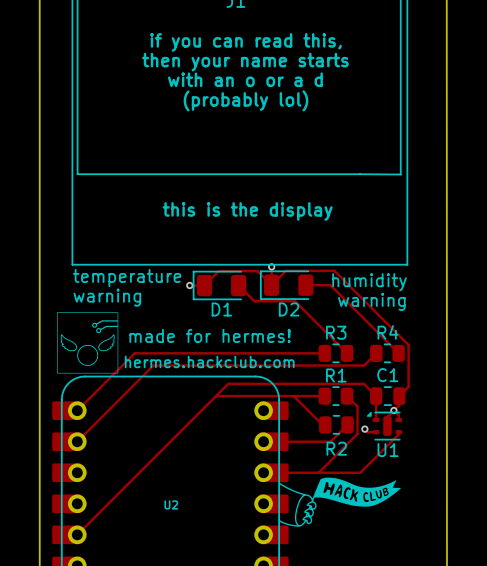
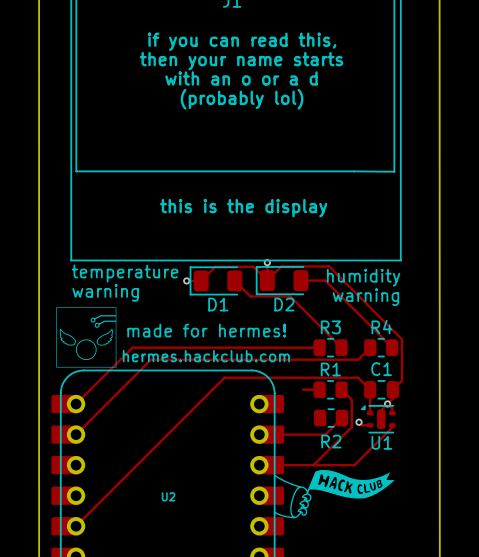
track: (216, 396) (307, 396) -> none
track: (293, 396) (322, 424) -> none

